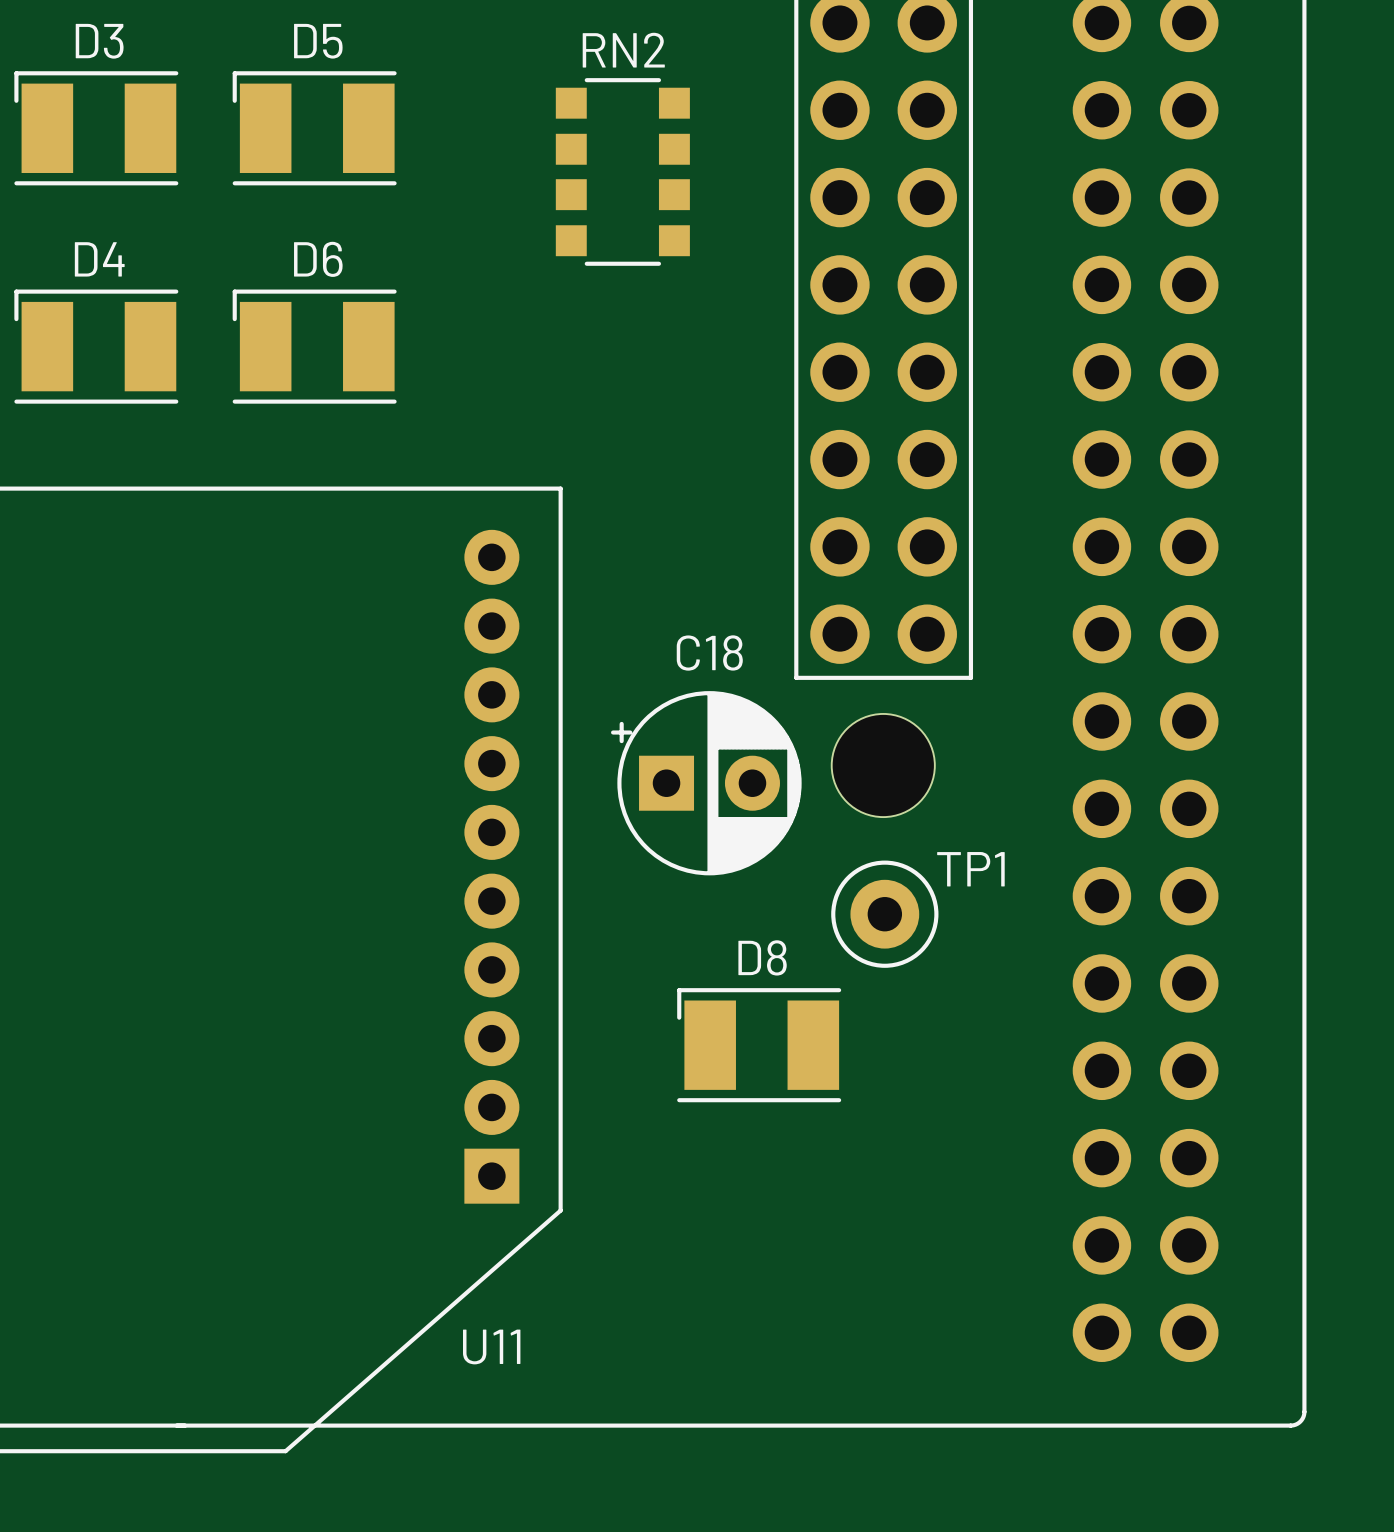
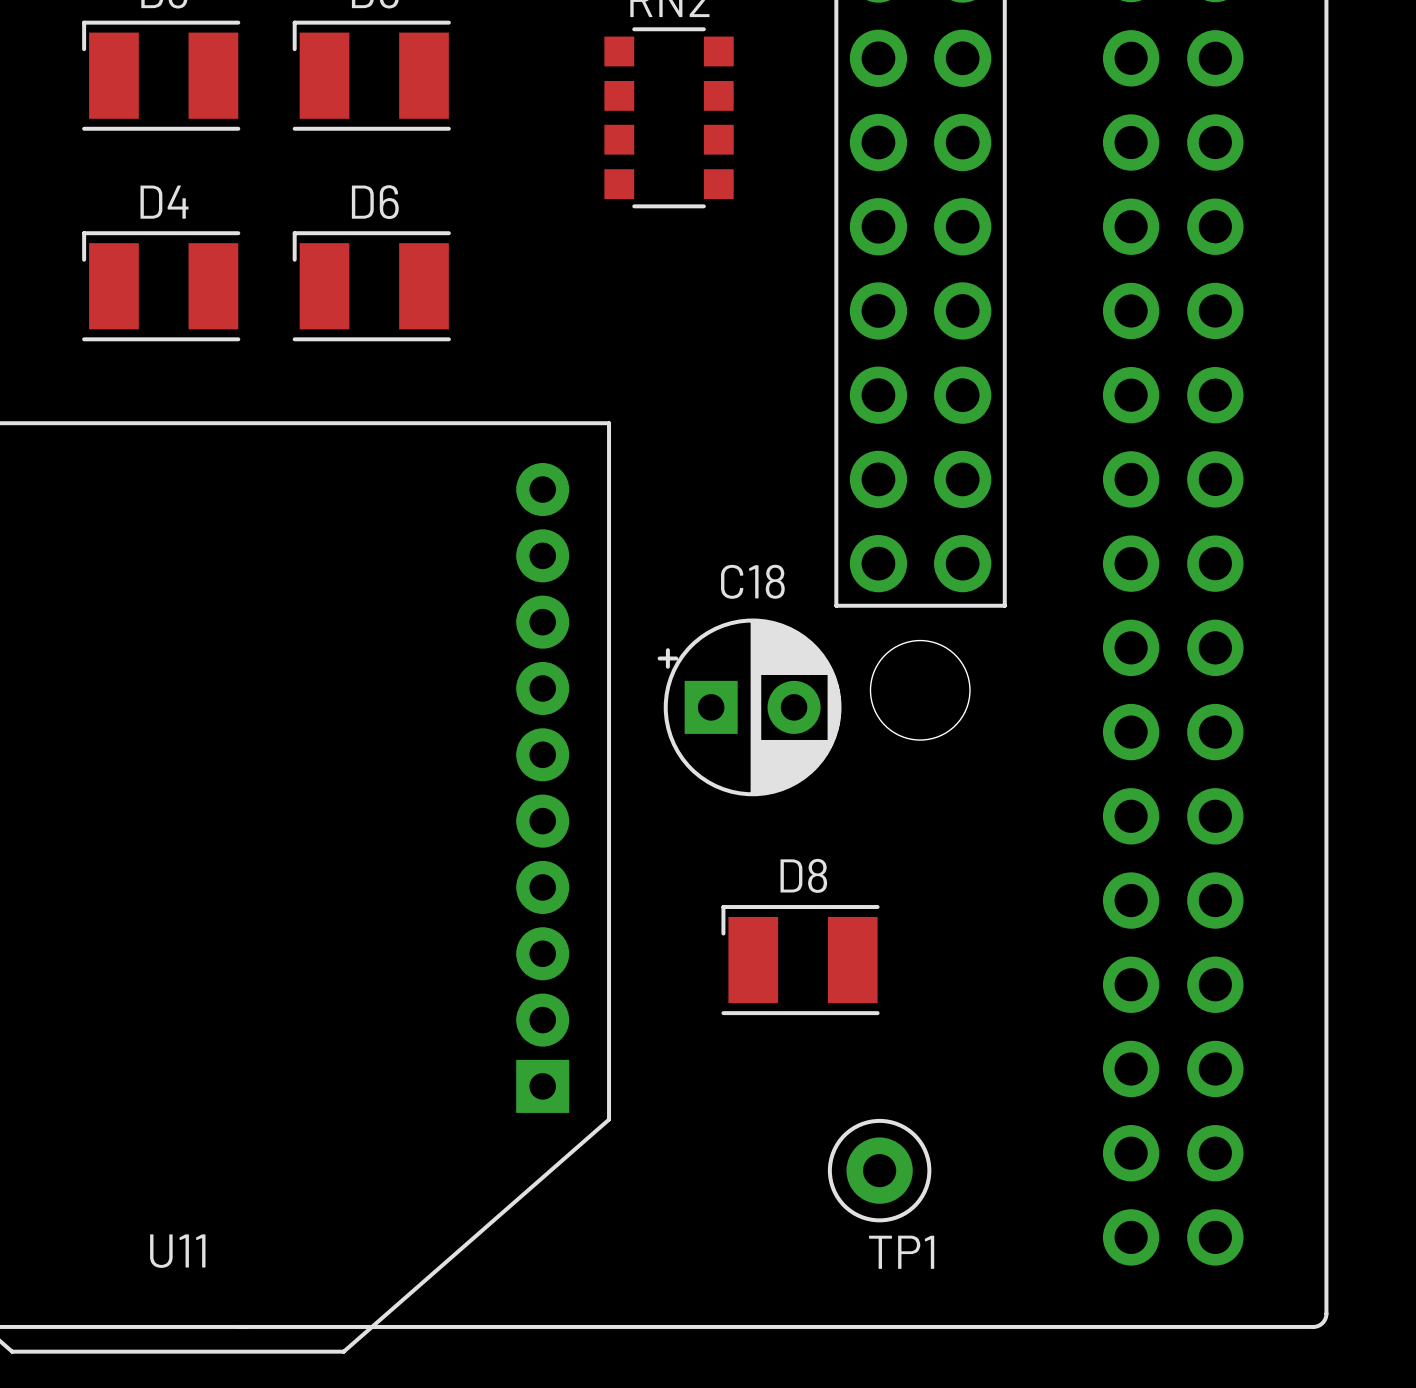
TP1 name position: TP1 (970, 869) -> TP1 (901, 1252)
TP1 position: (884, 914) -> (879, 1170)
U11 name position: U11 (491, 1346) -> U11 (177, 1251)

